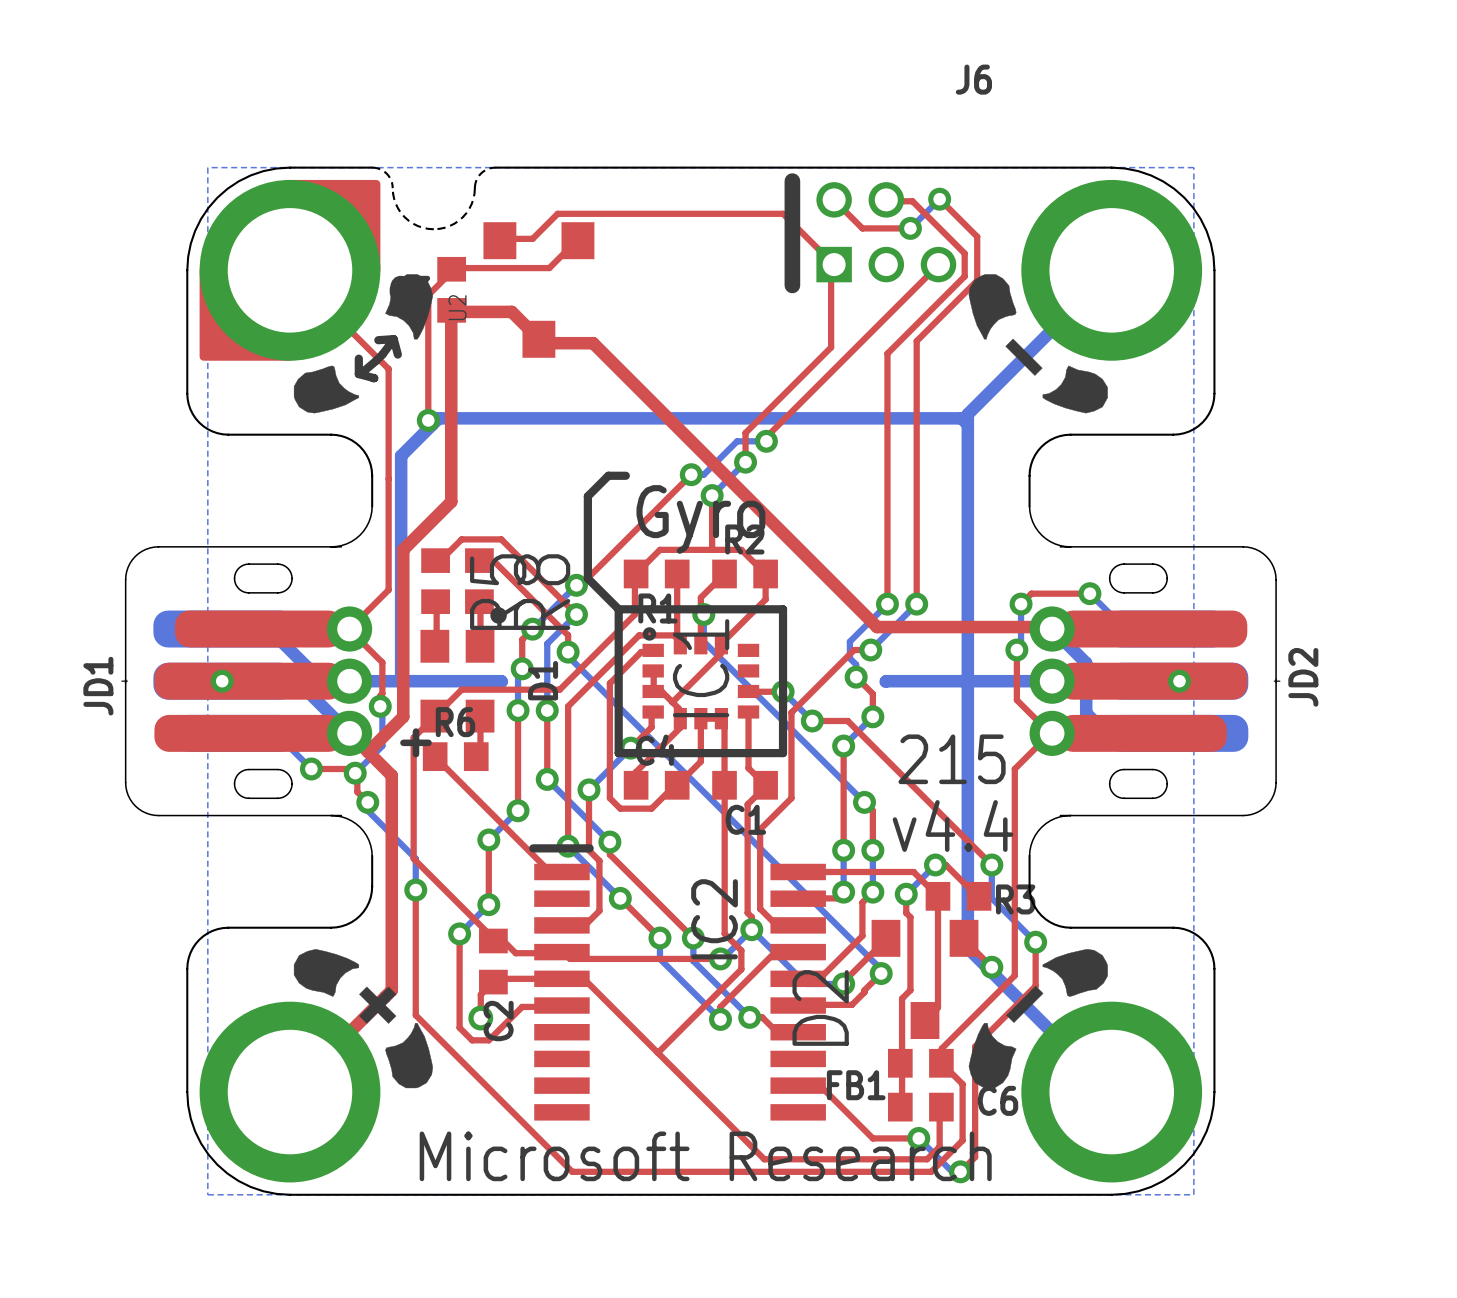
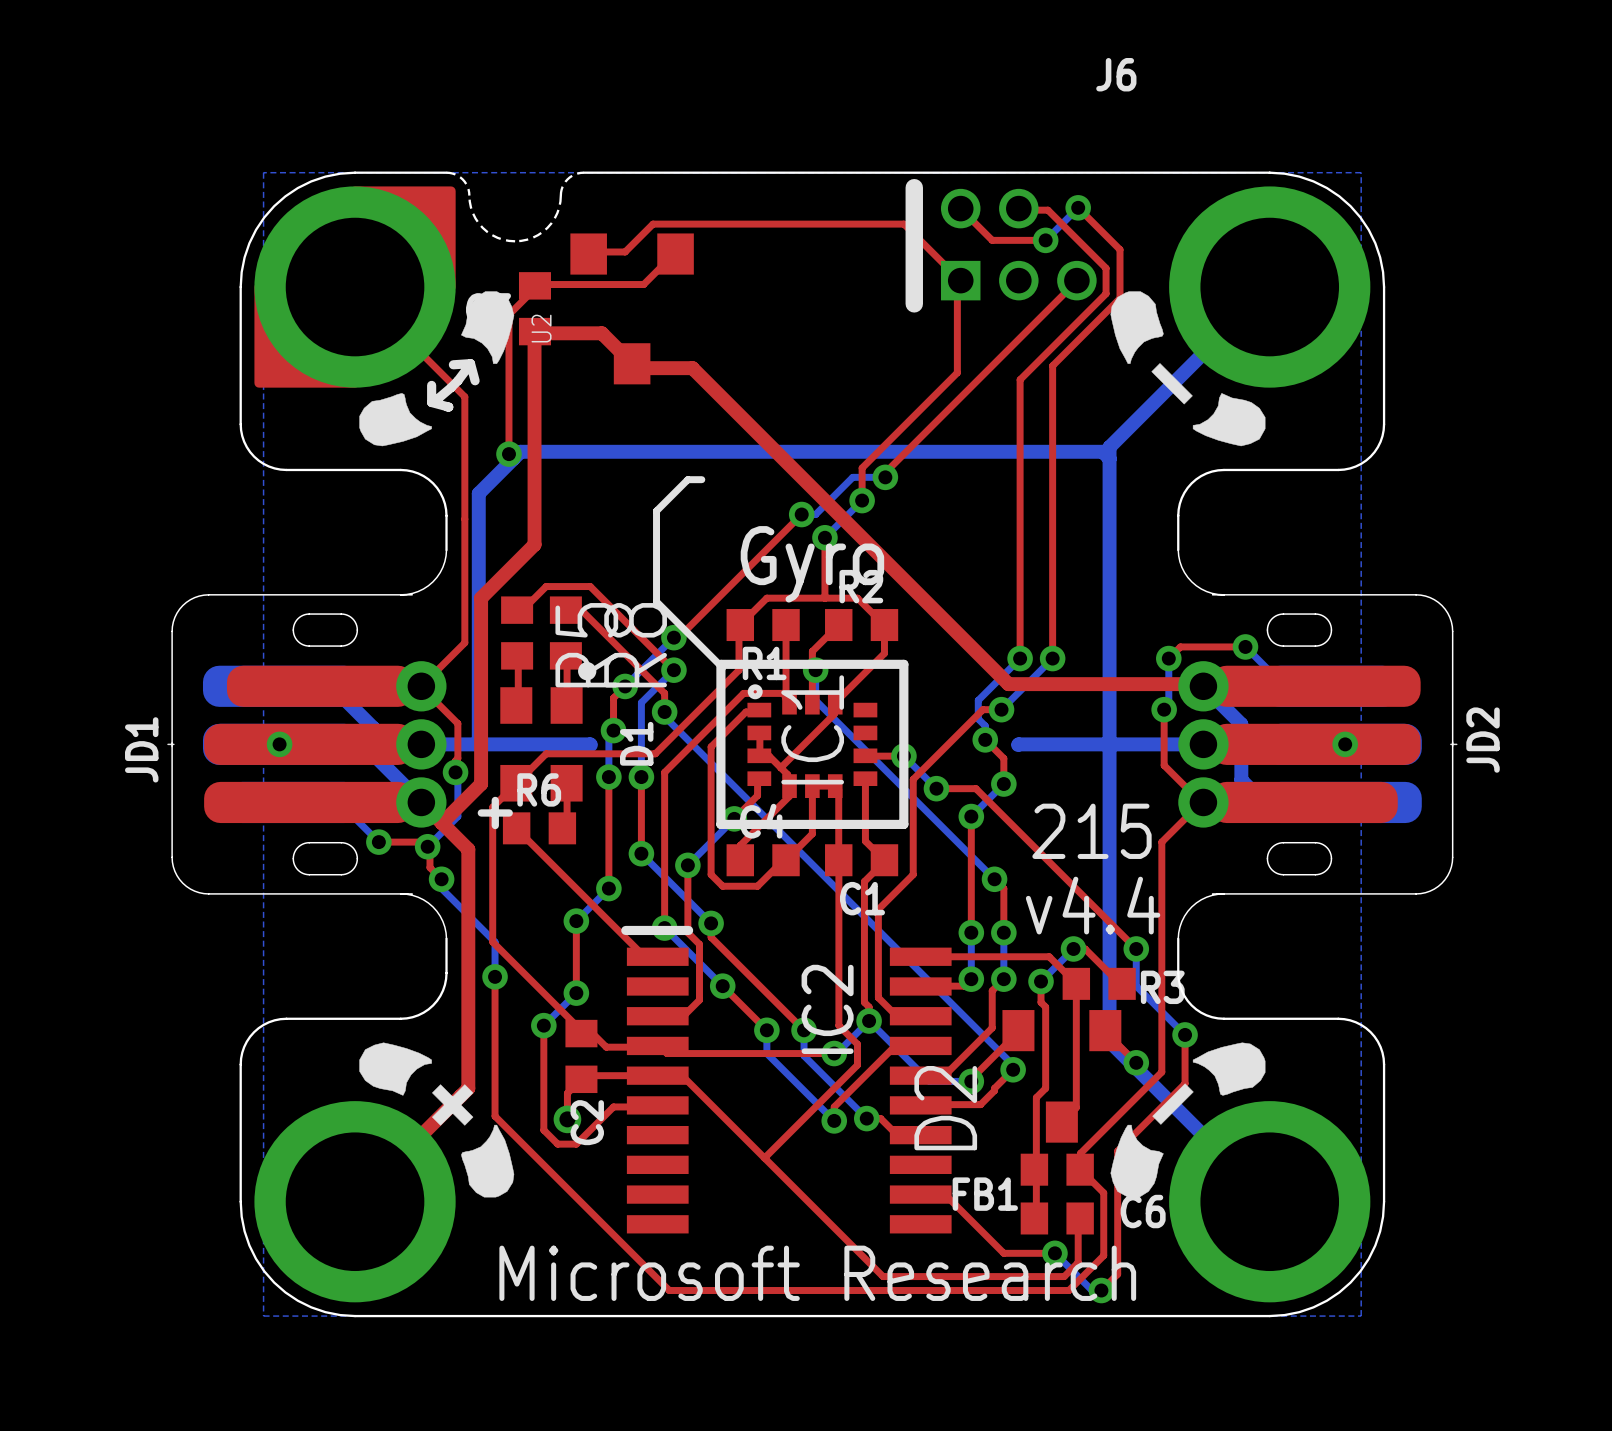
line: none -> (701, 479) (687, 479) (656, 511) (656, 601) (722, 667)
line: (625, 475) (608, 475) (587, 496) (587, 578) (618, 609) -> none

